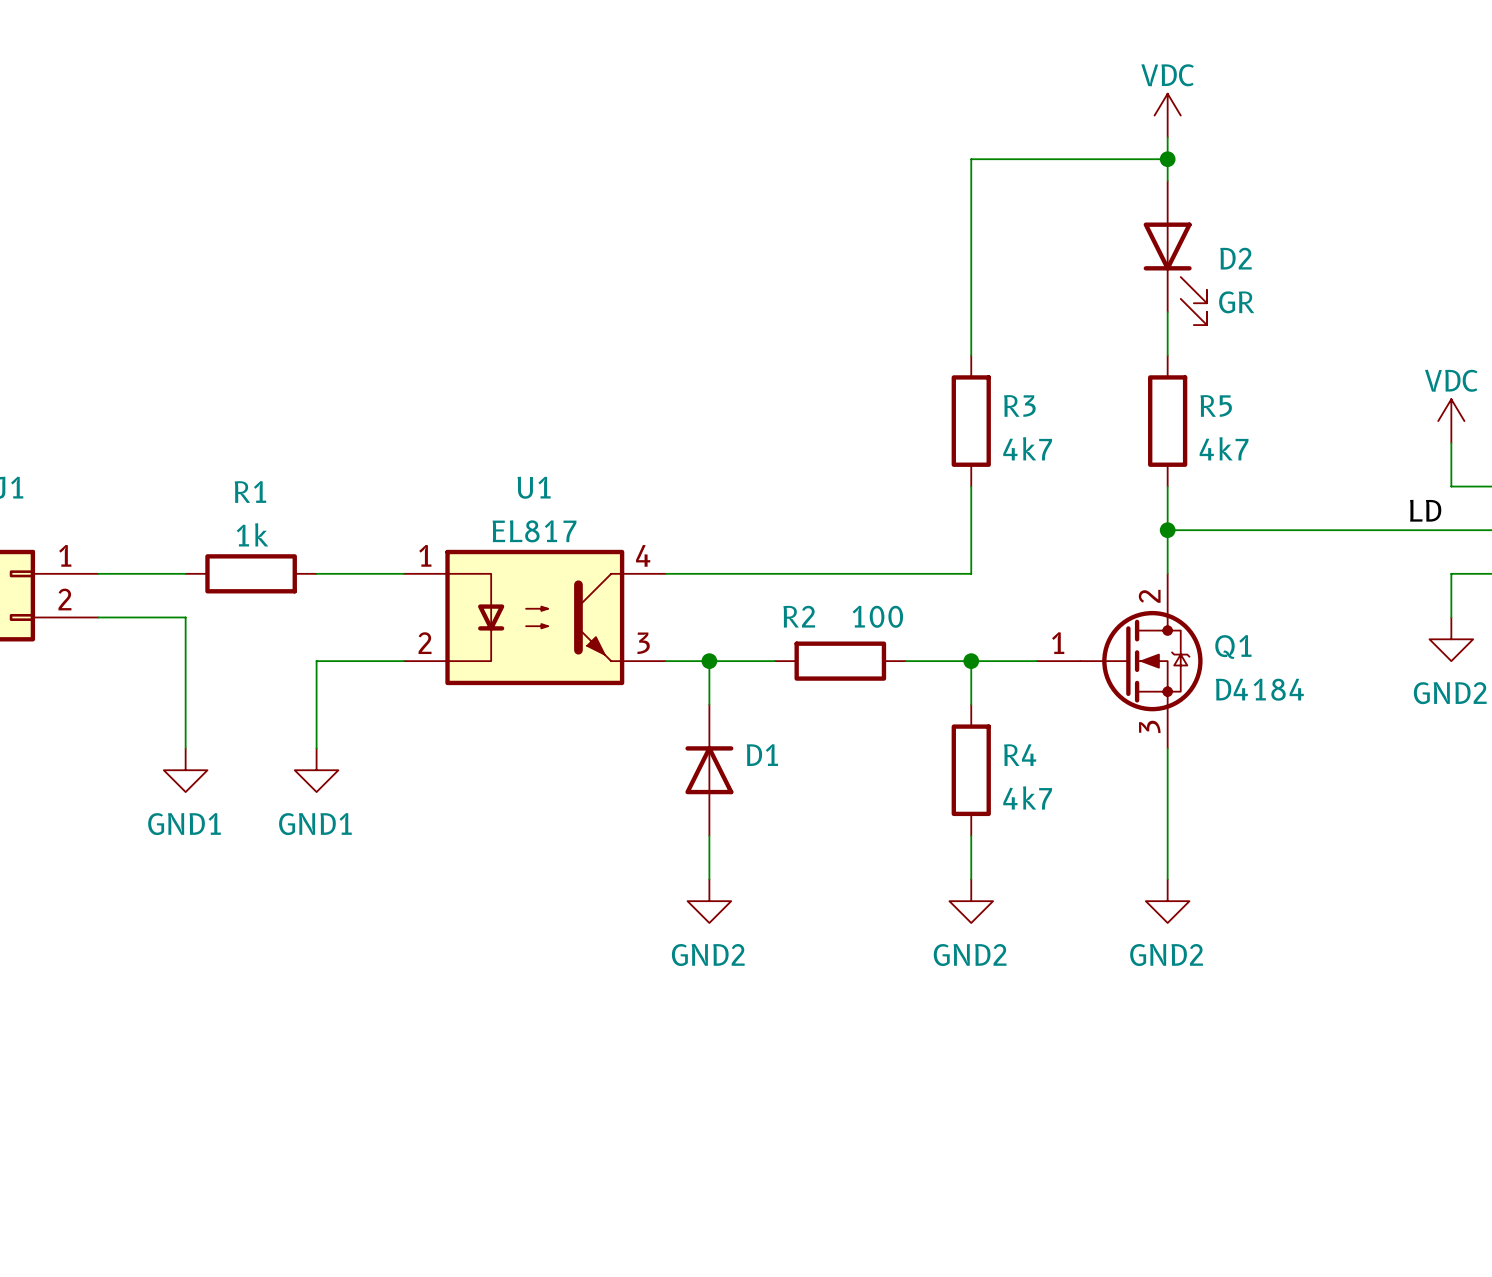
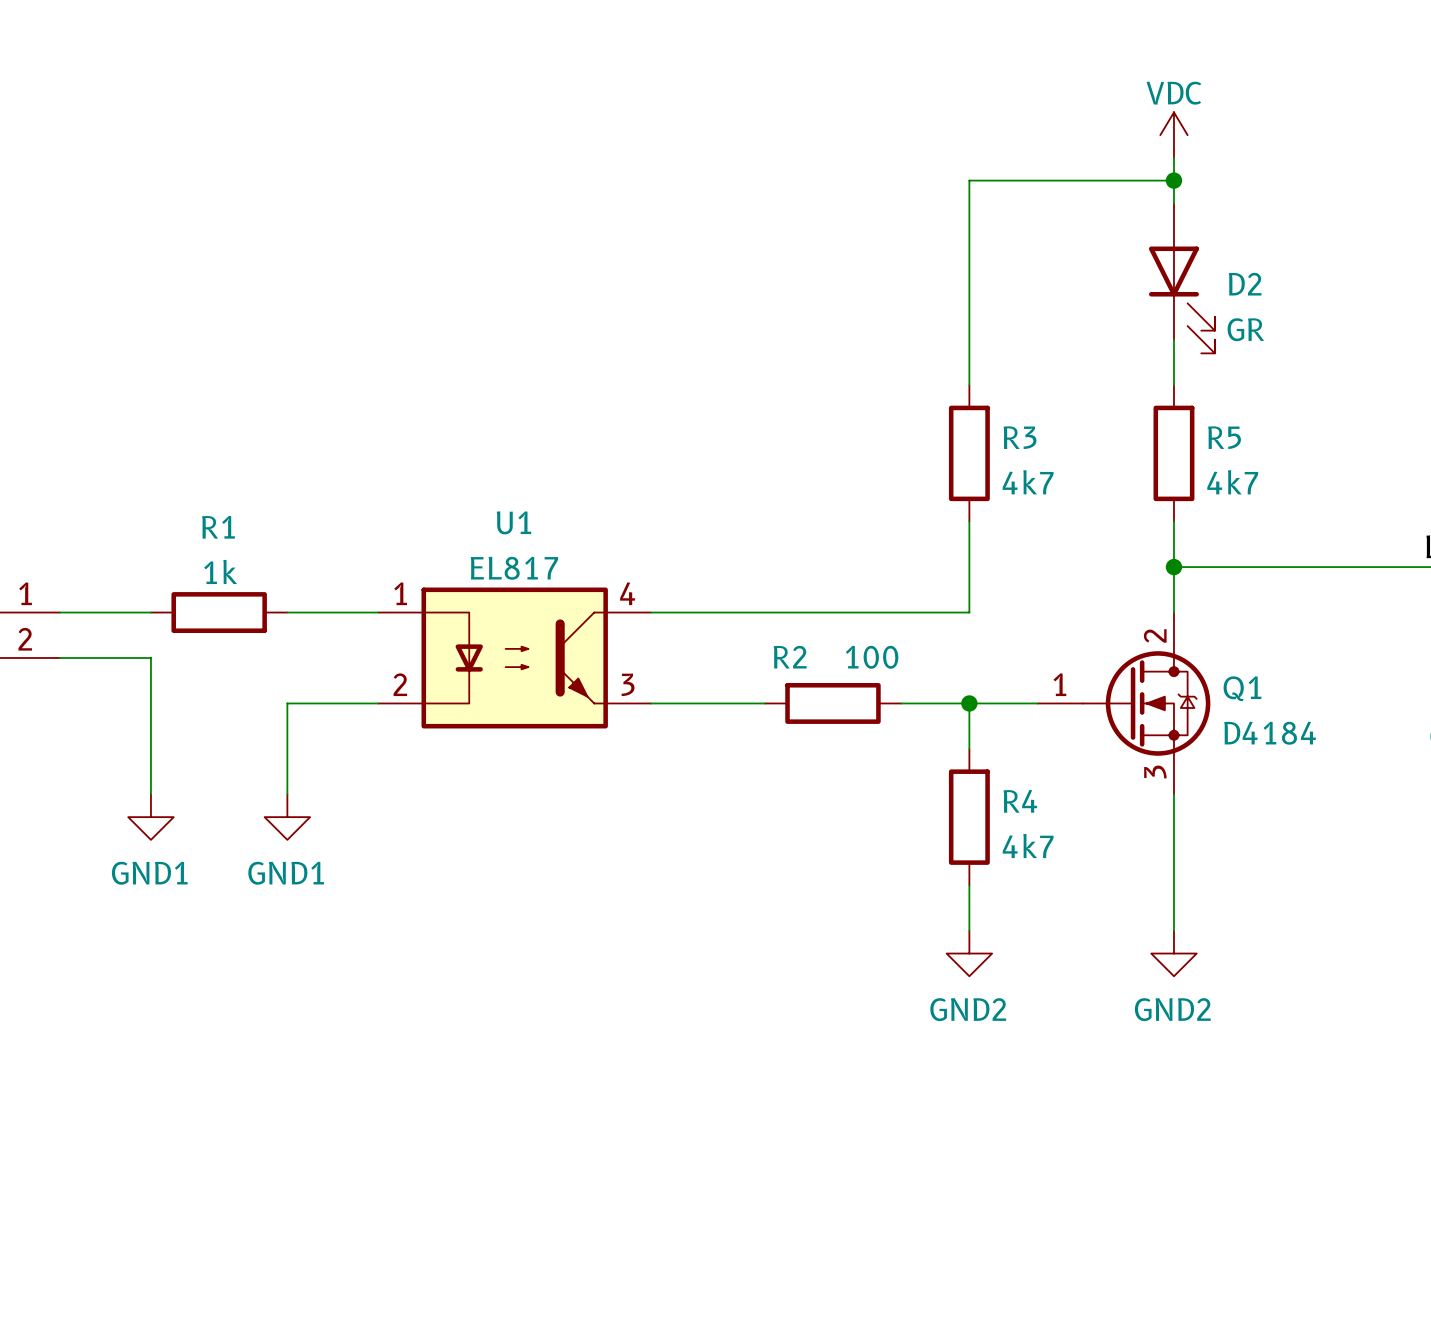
wire: (709, 661) (709, 704) -> none
junction: (709, 661) -> none
D1: (709, 770) -> none
wire: (709, 835) (709, 879) -> none
power symbol: GND2 (709, 901) -> none

